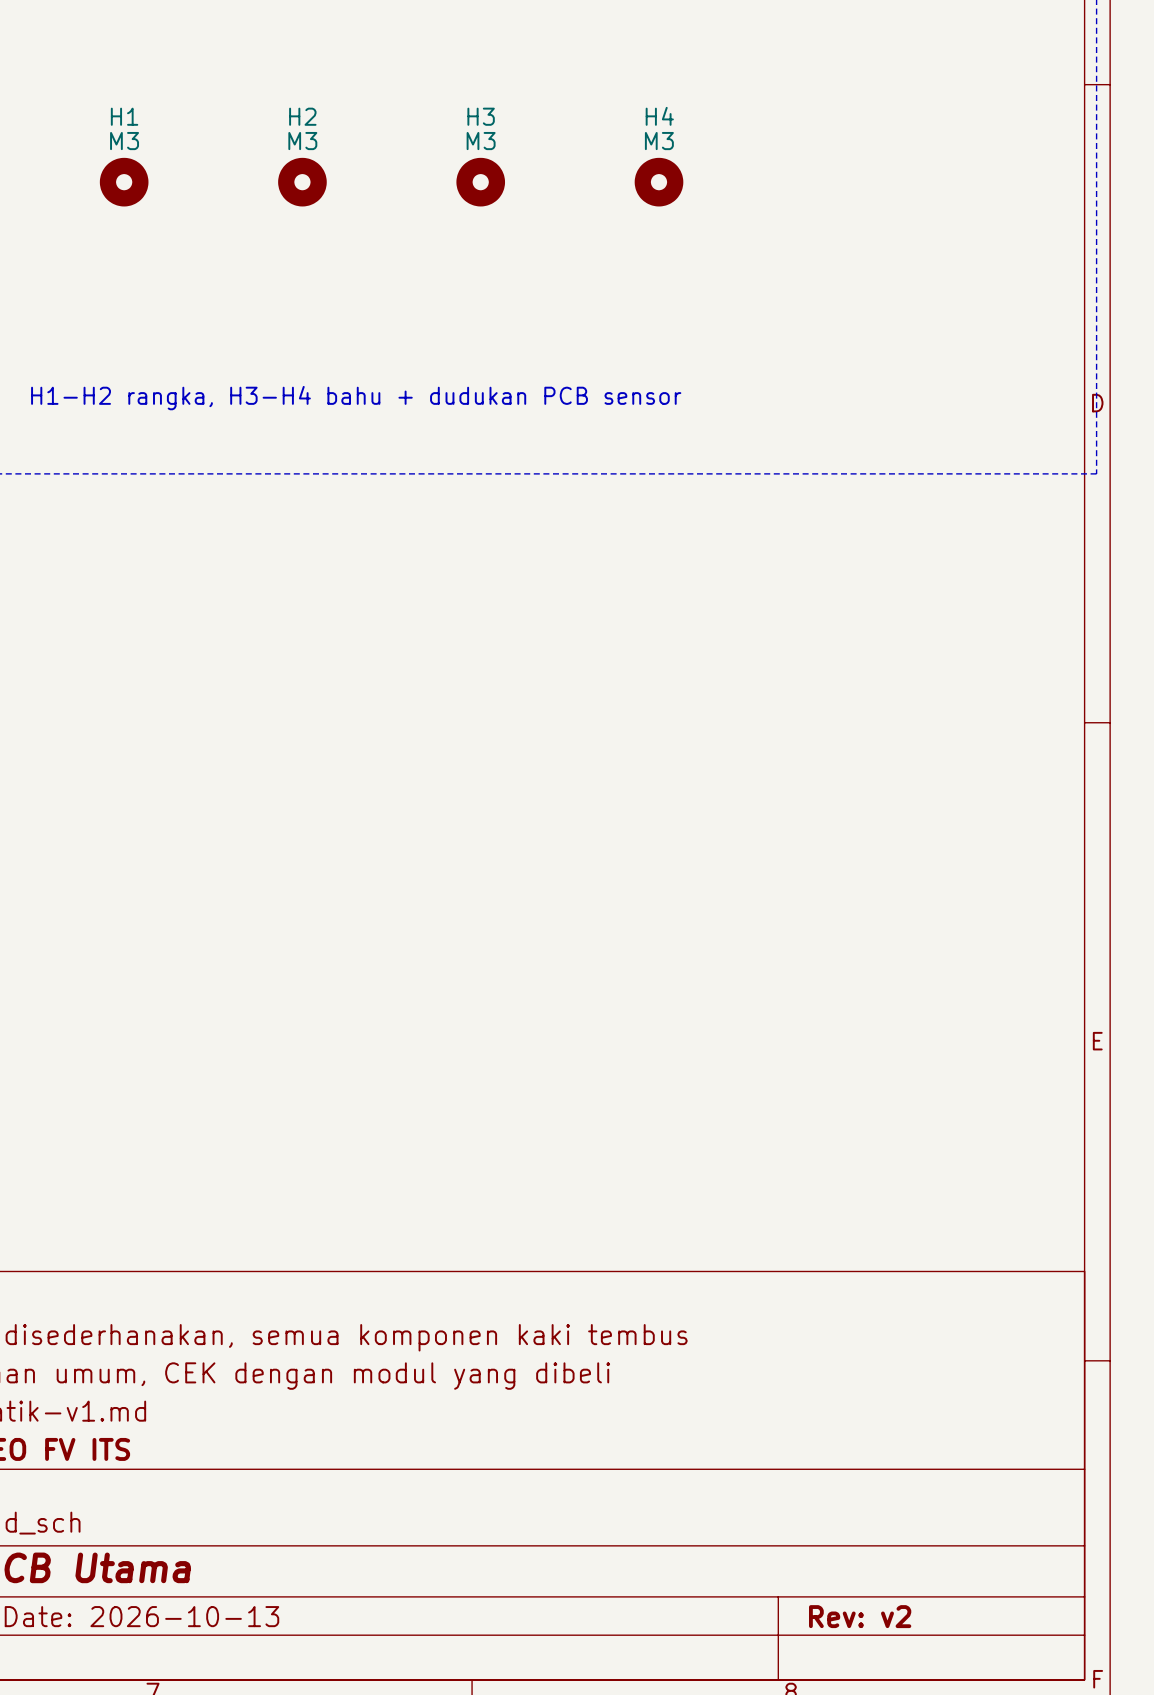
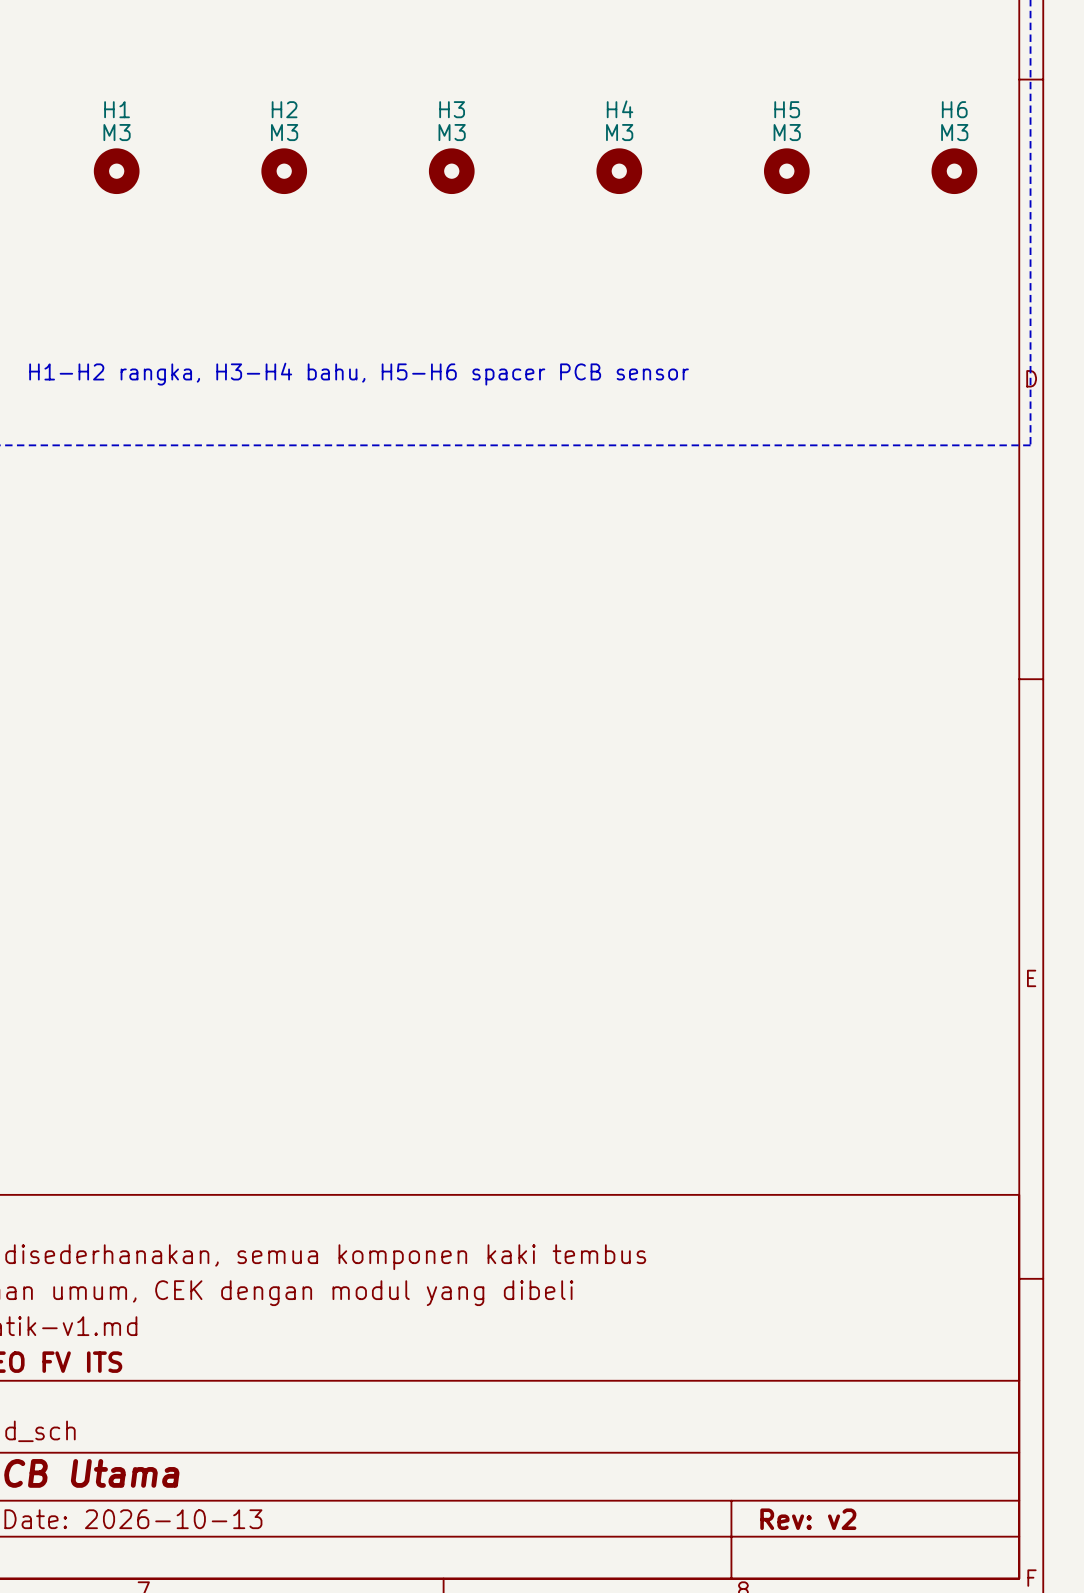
H5: none -> M3 (786, 171)
H6: none -> M3 (954, 171)
text: H1-H2 rangka, H3-H4 bahu + dudukan PCB sensor (356, 398) -> H1-H2 rangka, H3-H4 bahu, H5-H6 spacer PCB sensor (359, 374)

